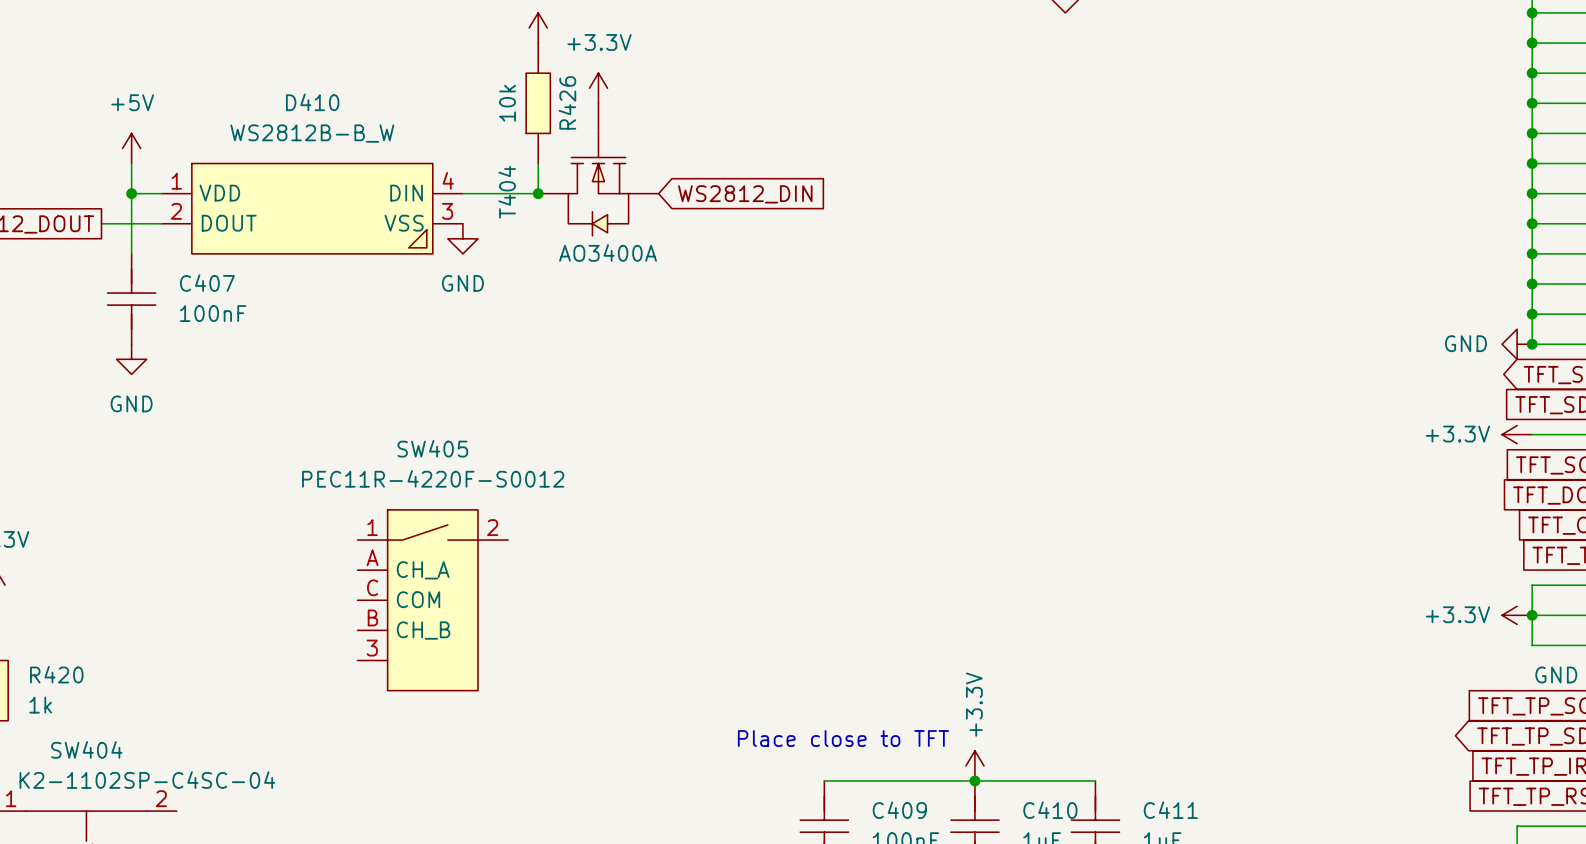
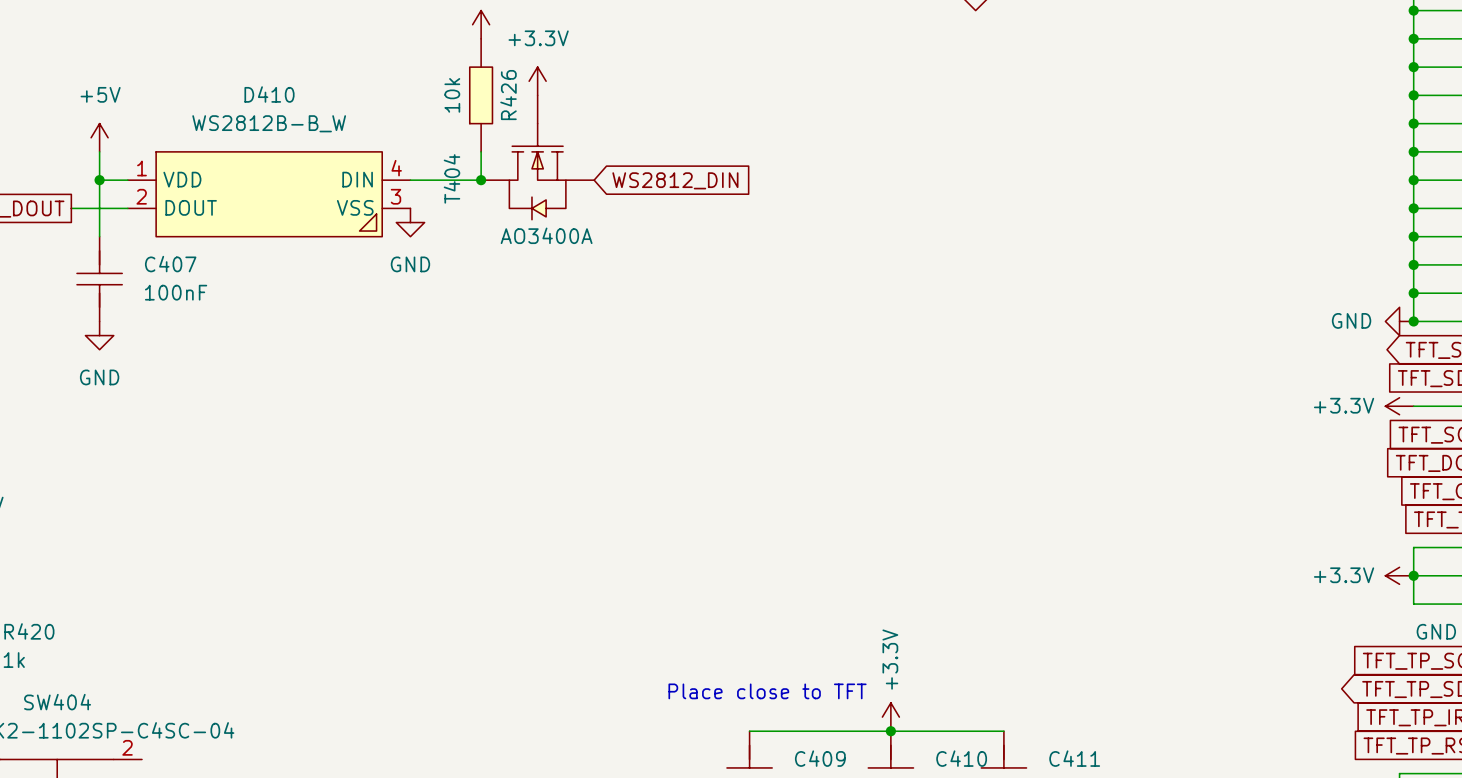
SW405: PEC11R-4220F-S0012 (432, 600) -> none

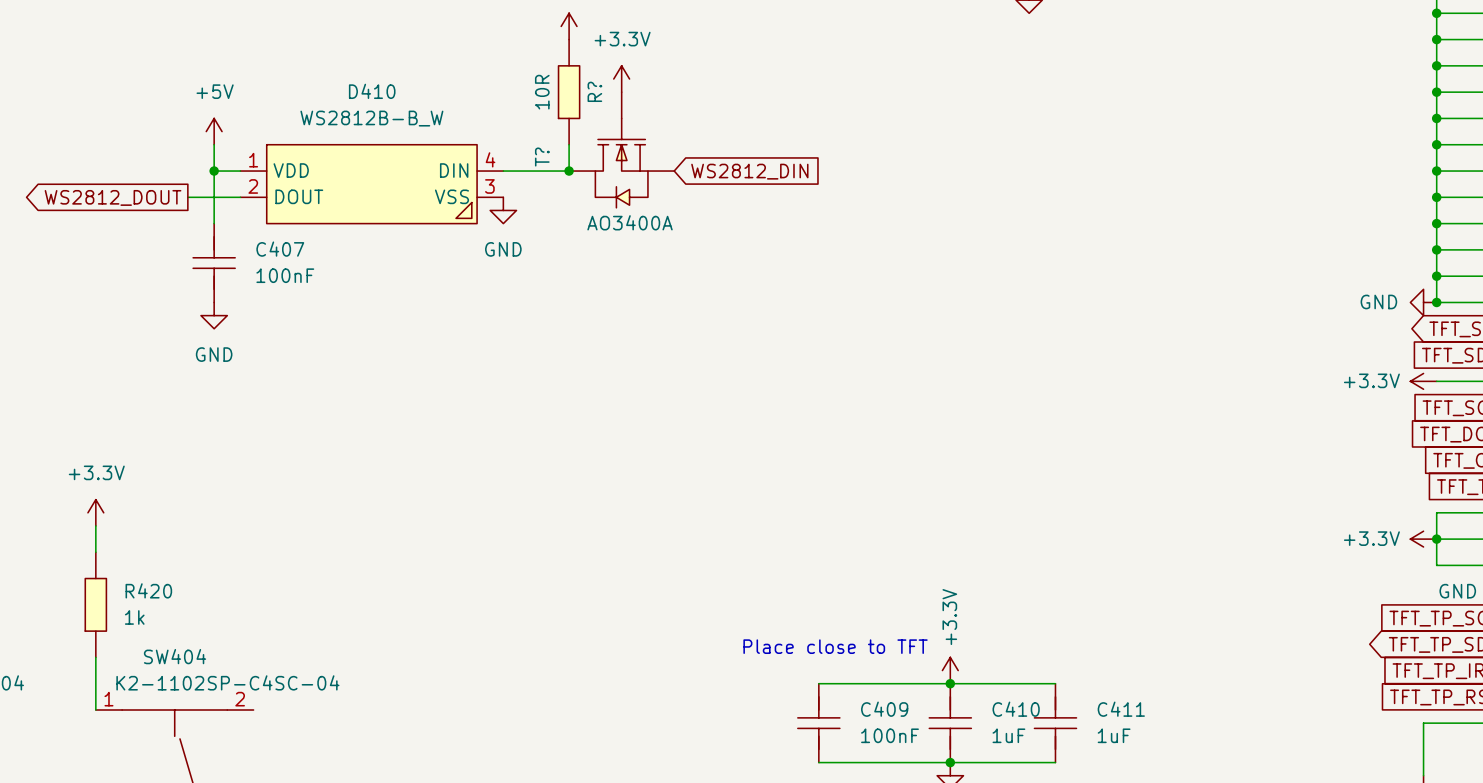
R426 value: 10k (452, 95) -> 10R (542, 92)
R426 name: R426 (508, 95) -> R? (594, 91)
T404 name: T404 (451, 178) -> T? (542, 157)

